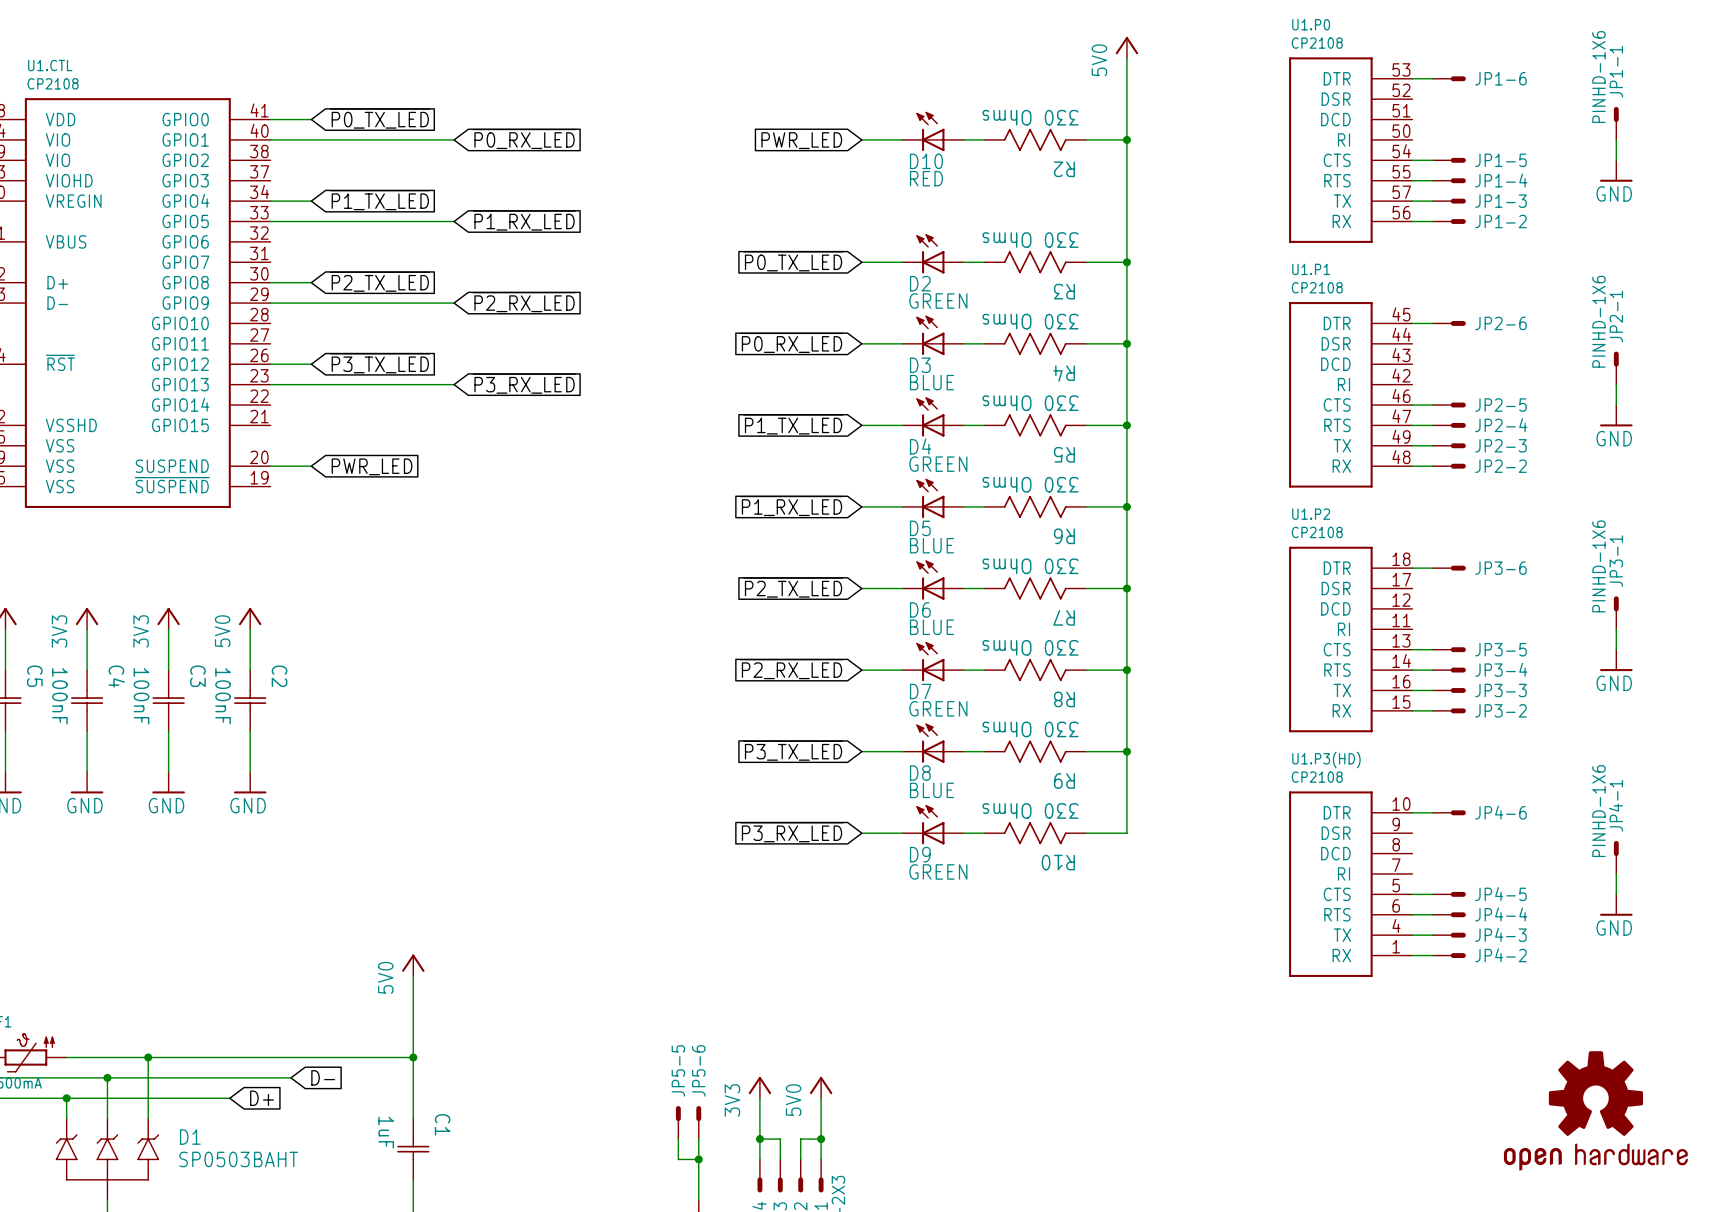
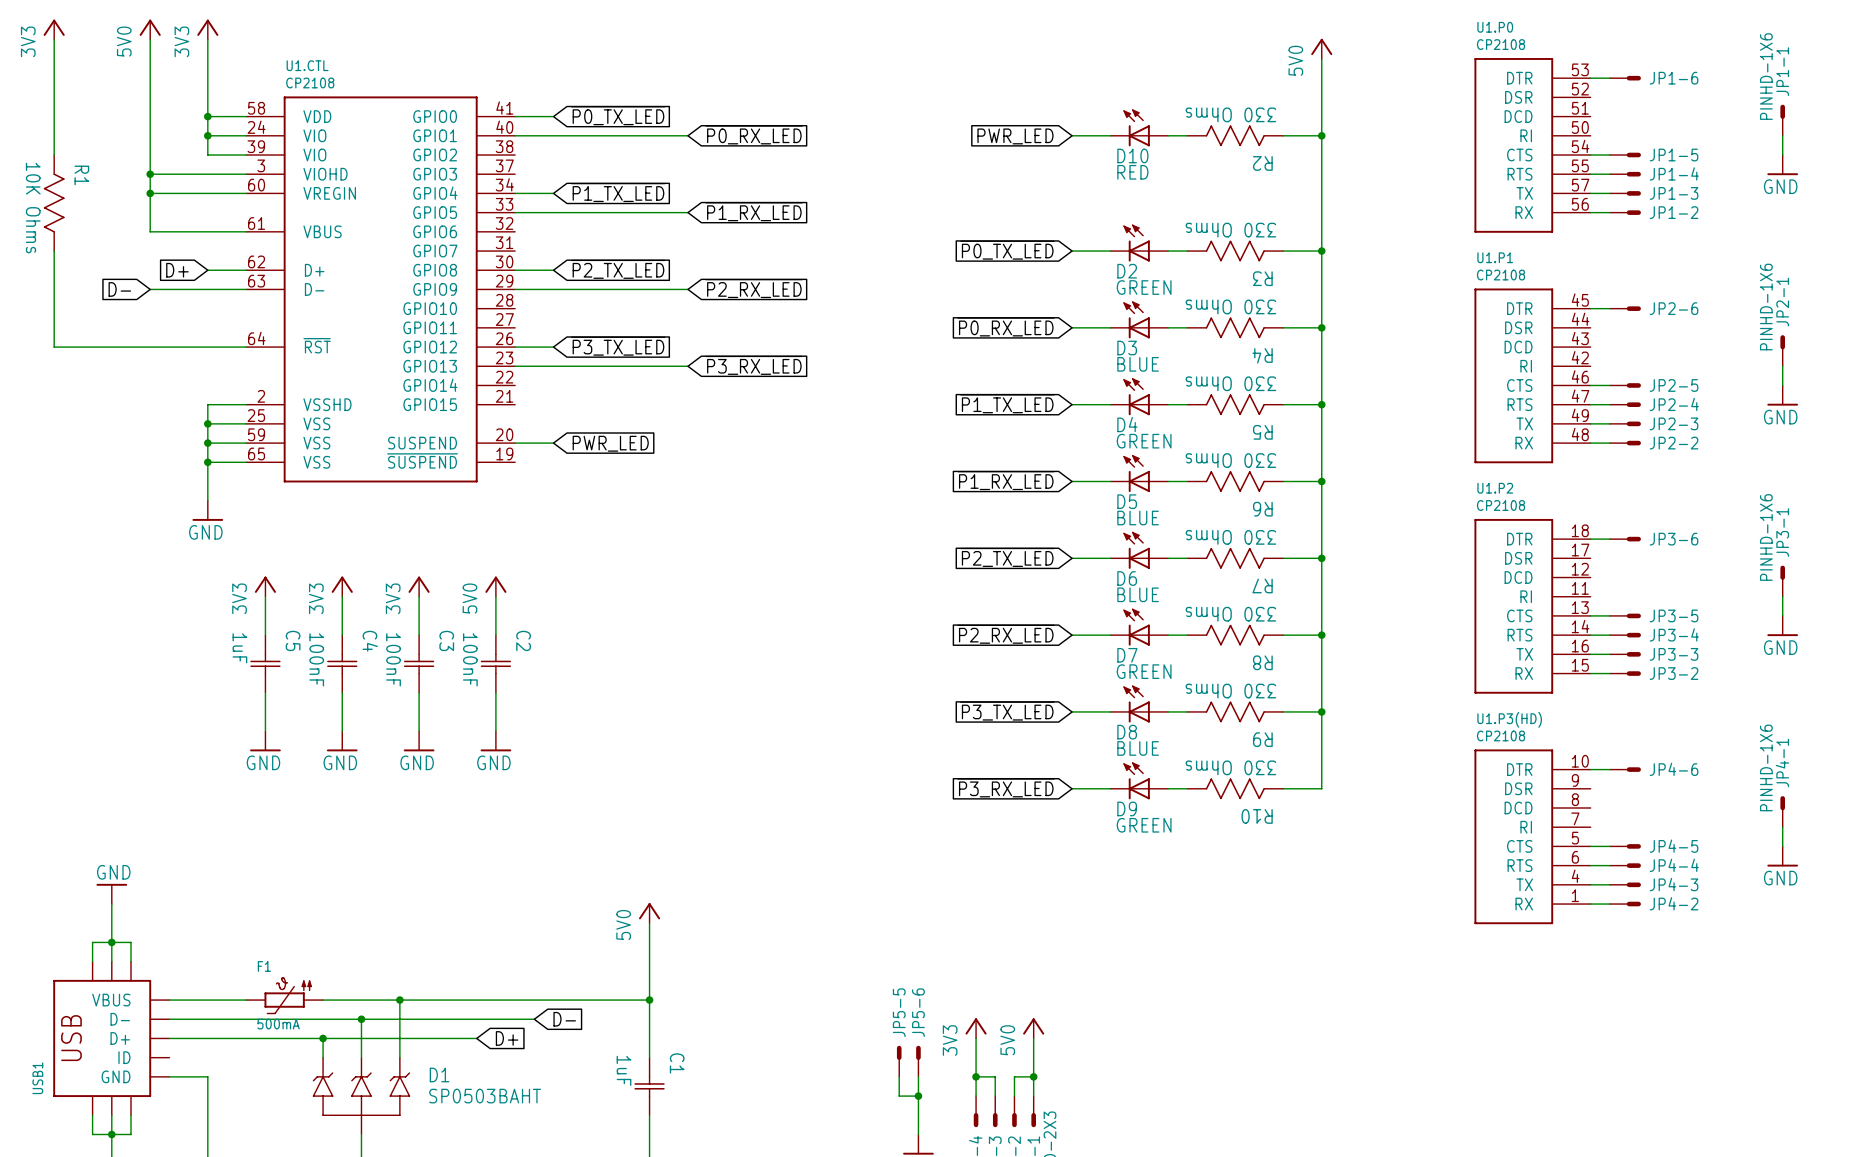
part: (1595, 1110) -> none

